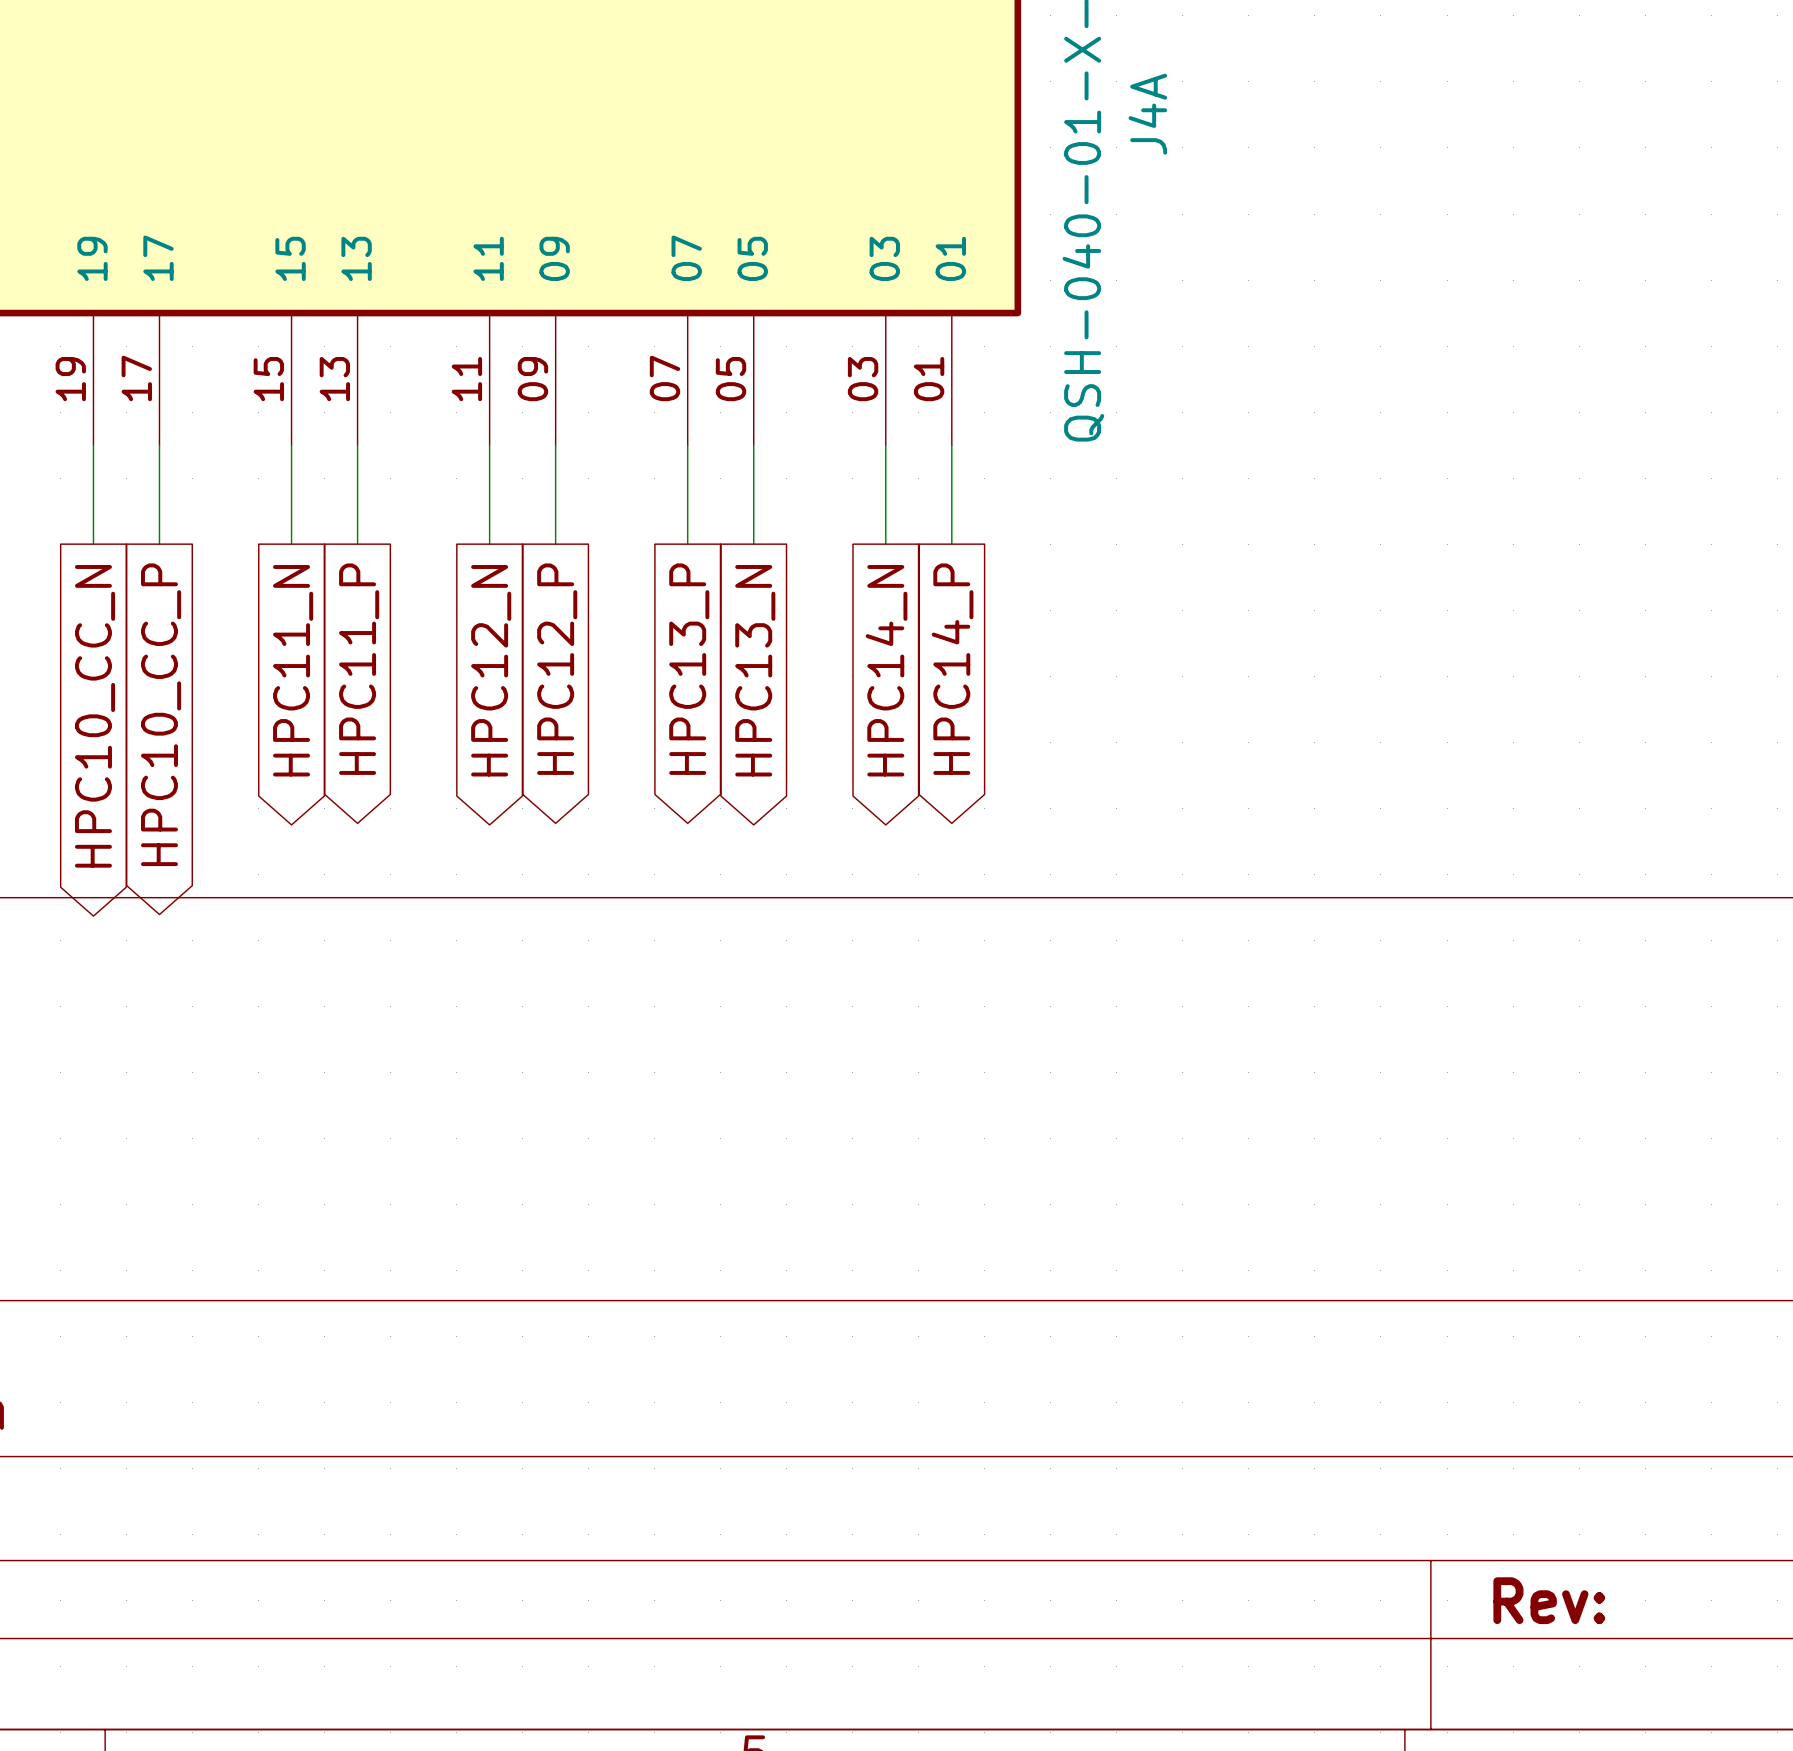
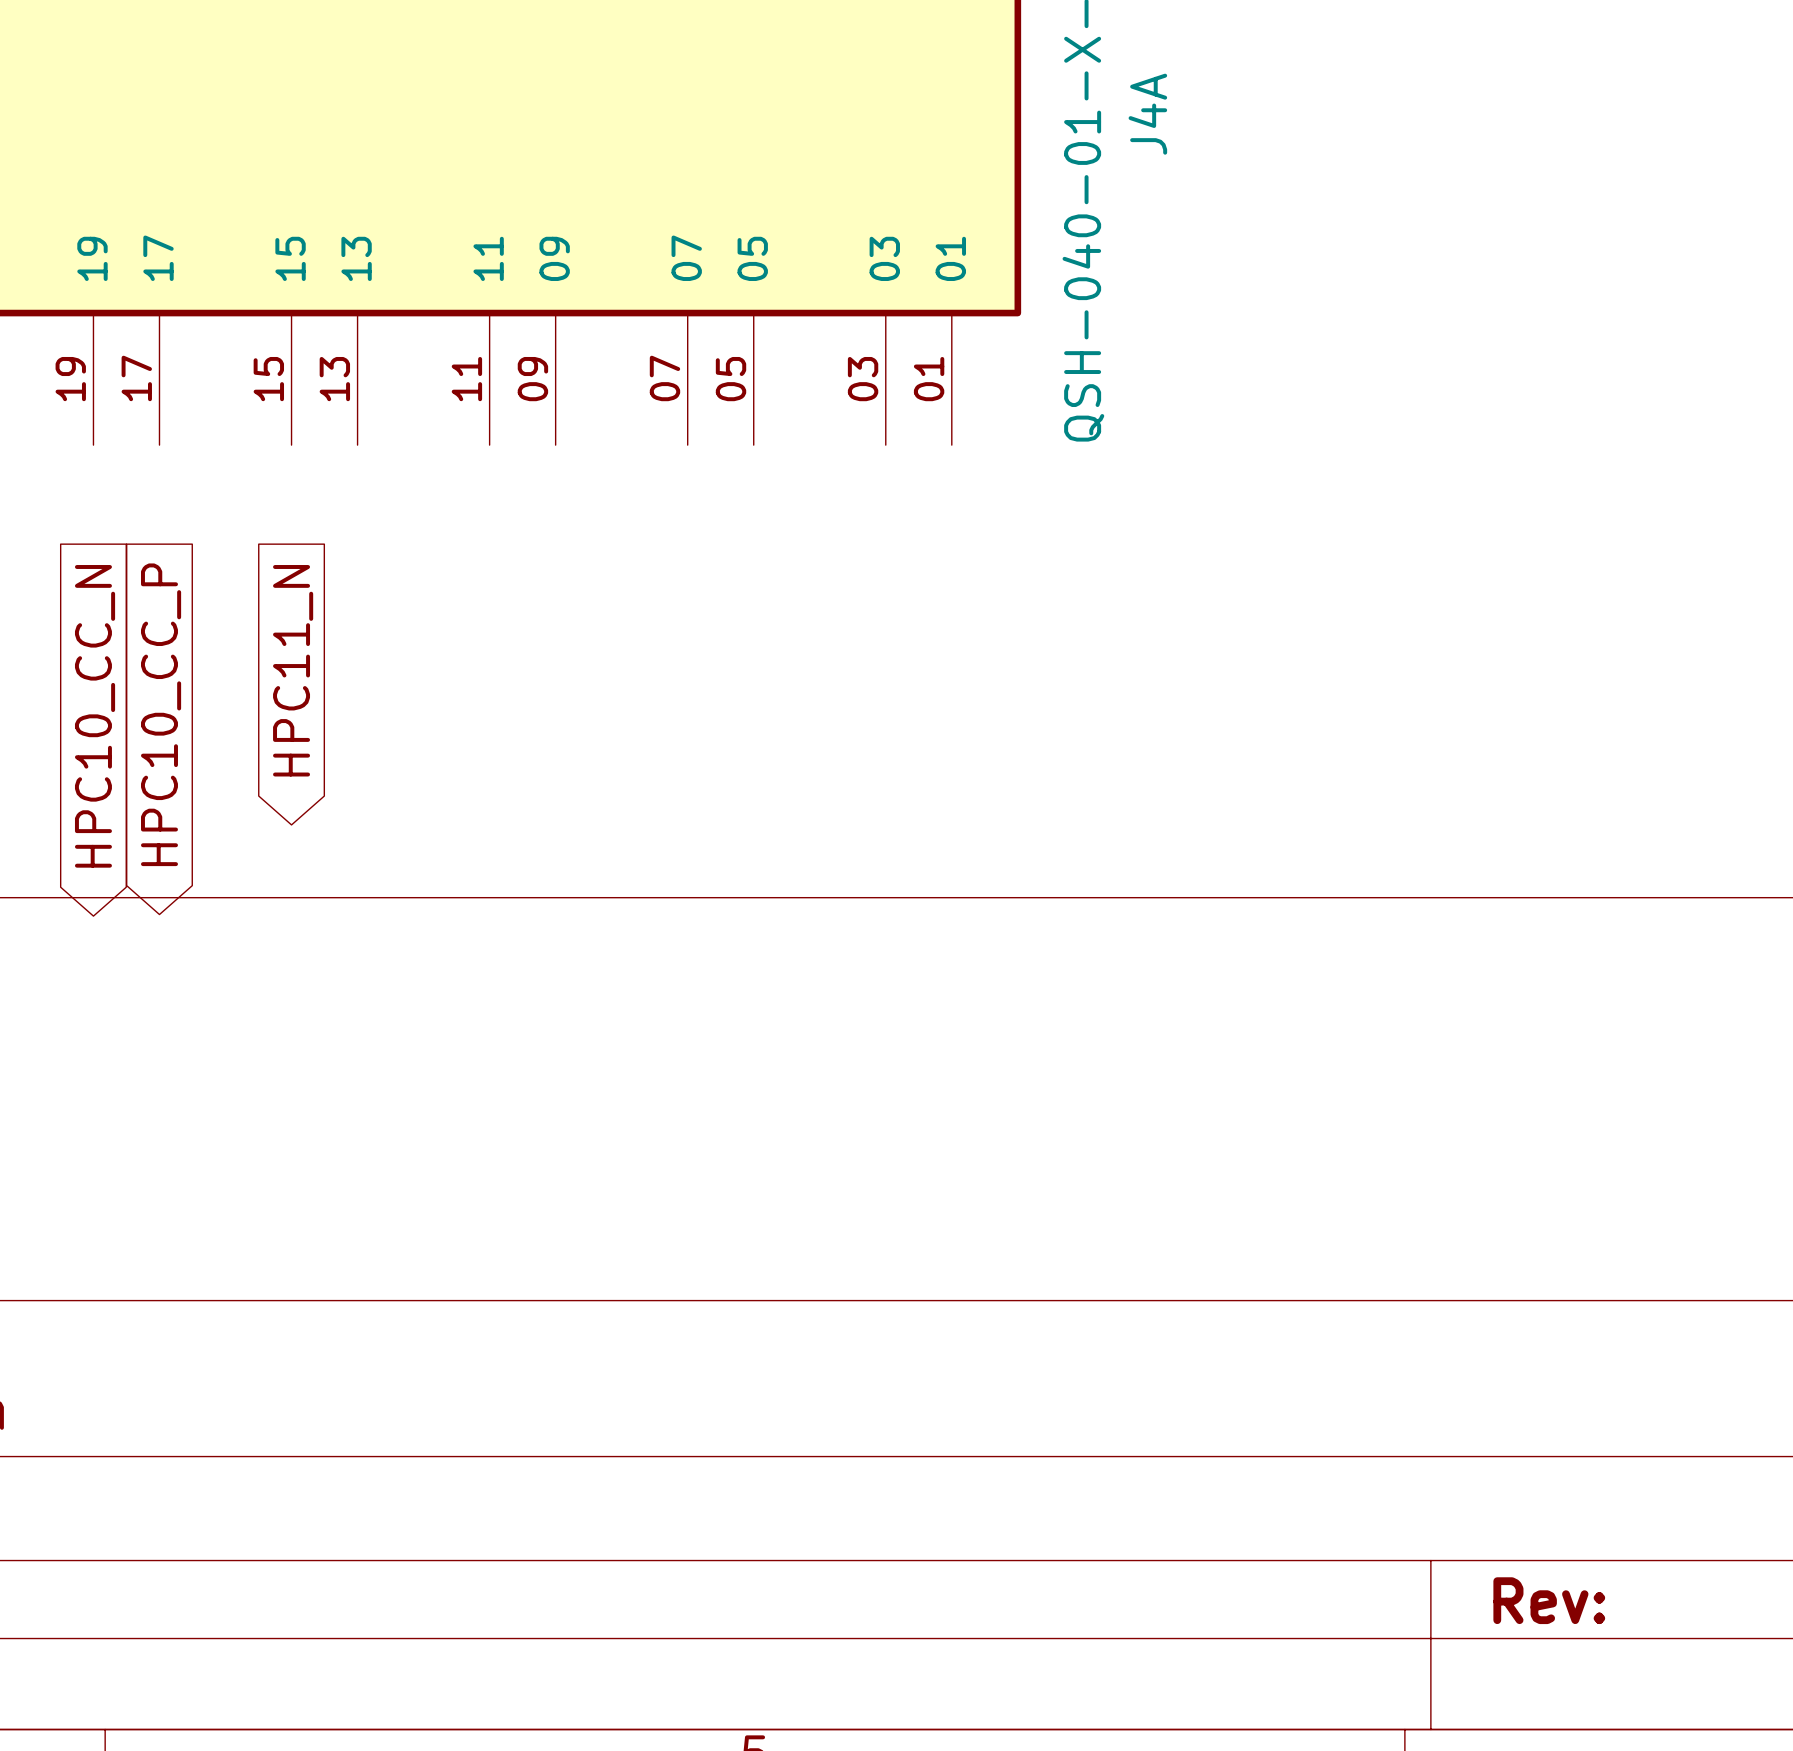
wire: (93, 445) (93, 544) -> none
wire: (159, 445) (159, 544) -> none
wire: (291, 445) (291, 544) -> none
wire: (357, 445) (357, 544) -> none
wire: (489, 445) (489, 544) -> none
wire: (555, 445) (555, 544) -> none
wire: (687, 445) (687, 544) -> none
wire: (753, 445) (753, 544) -> none
wire: (885, 445) (885, 544) -> none
wire: (951, 445) (951, 544) -> none
global label: HPC11_P (359, 669) -> none
global label: HPC12_P (557, 669) -> none
global label: HPC13_P (689, 669) -> none
global label: HPC14_P (952, 669) -> none
global label: HPC12_N (491, 670) -> none
global label: HPC13_N (755, 670) -> none
global label: HPC14_N (886, 670) -> none

